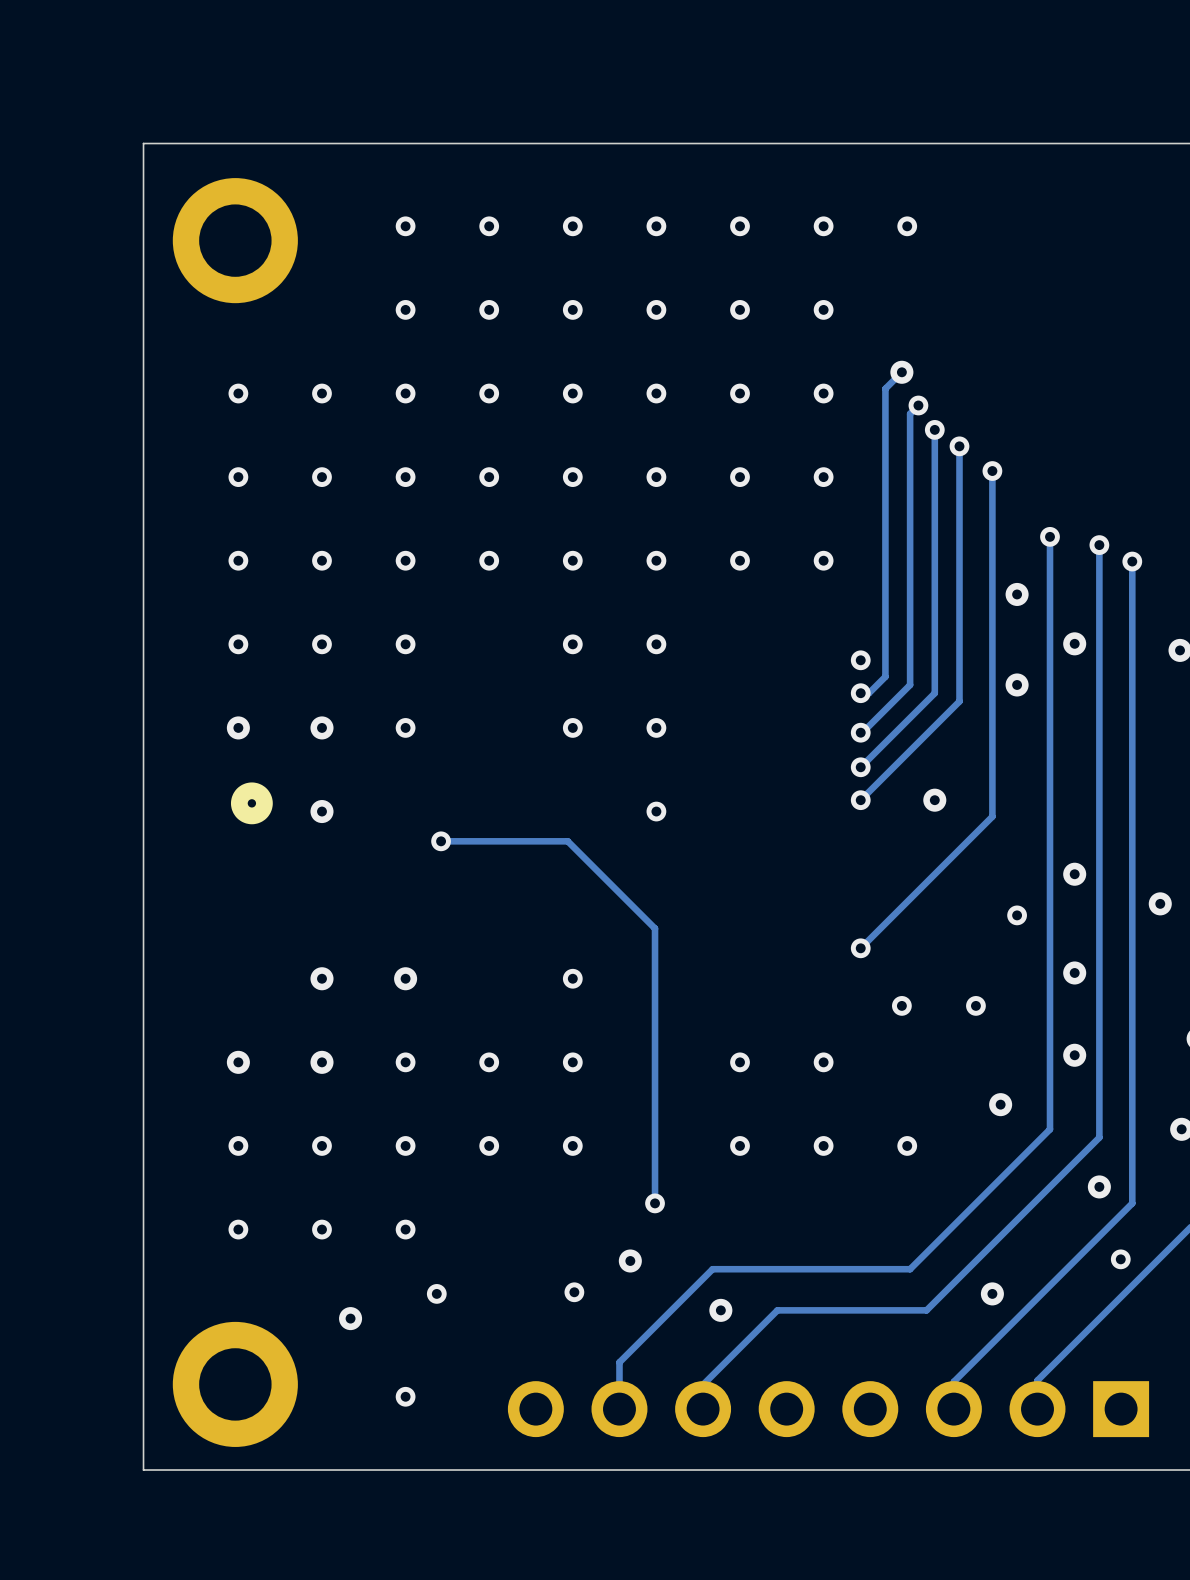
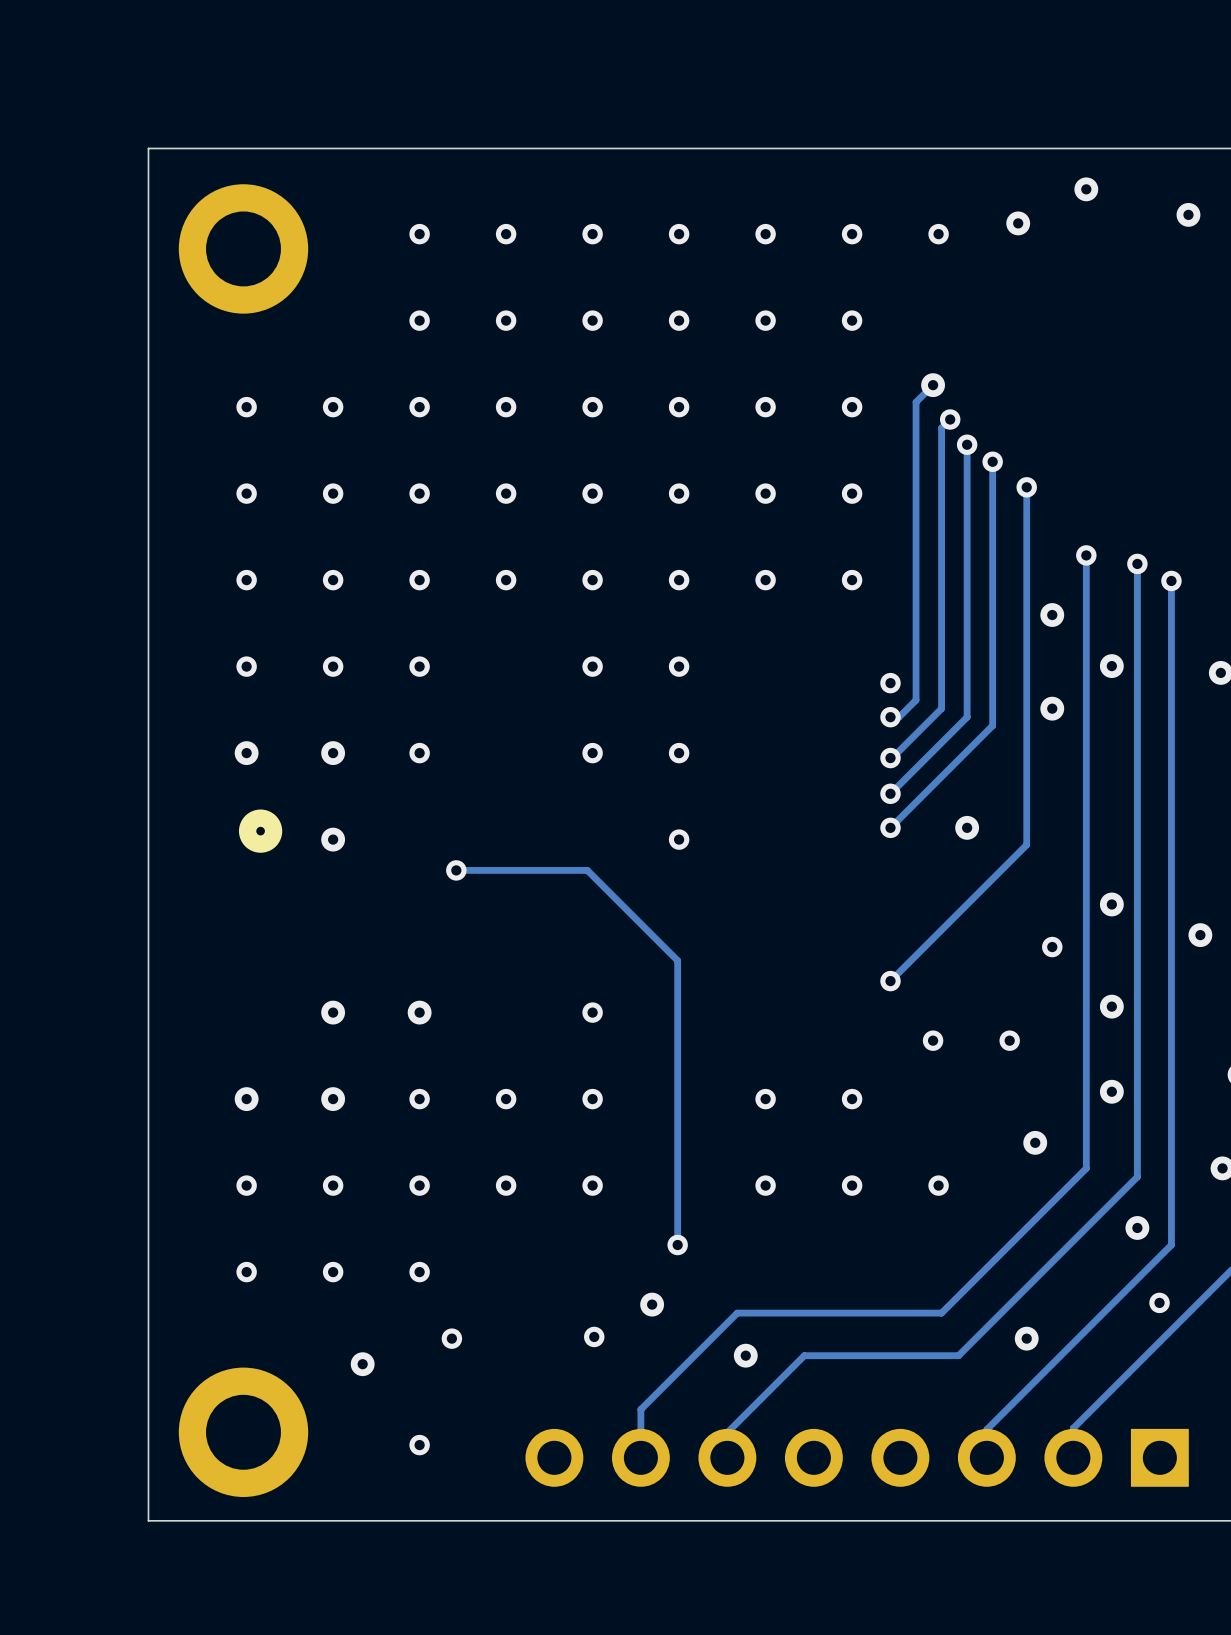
via: none -> (1086, 189)
via: none -> (1188, 214)
via: none -> (1018, 223)

